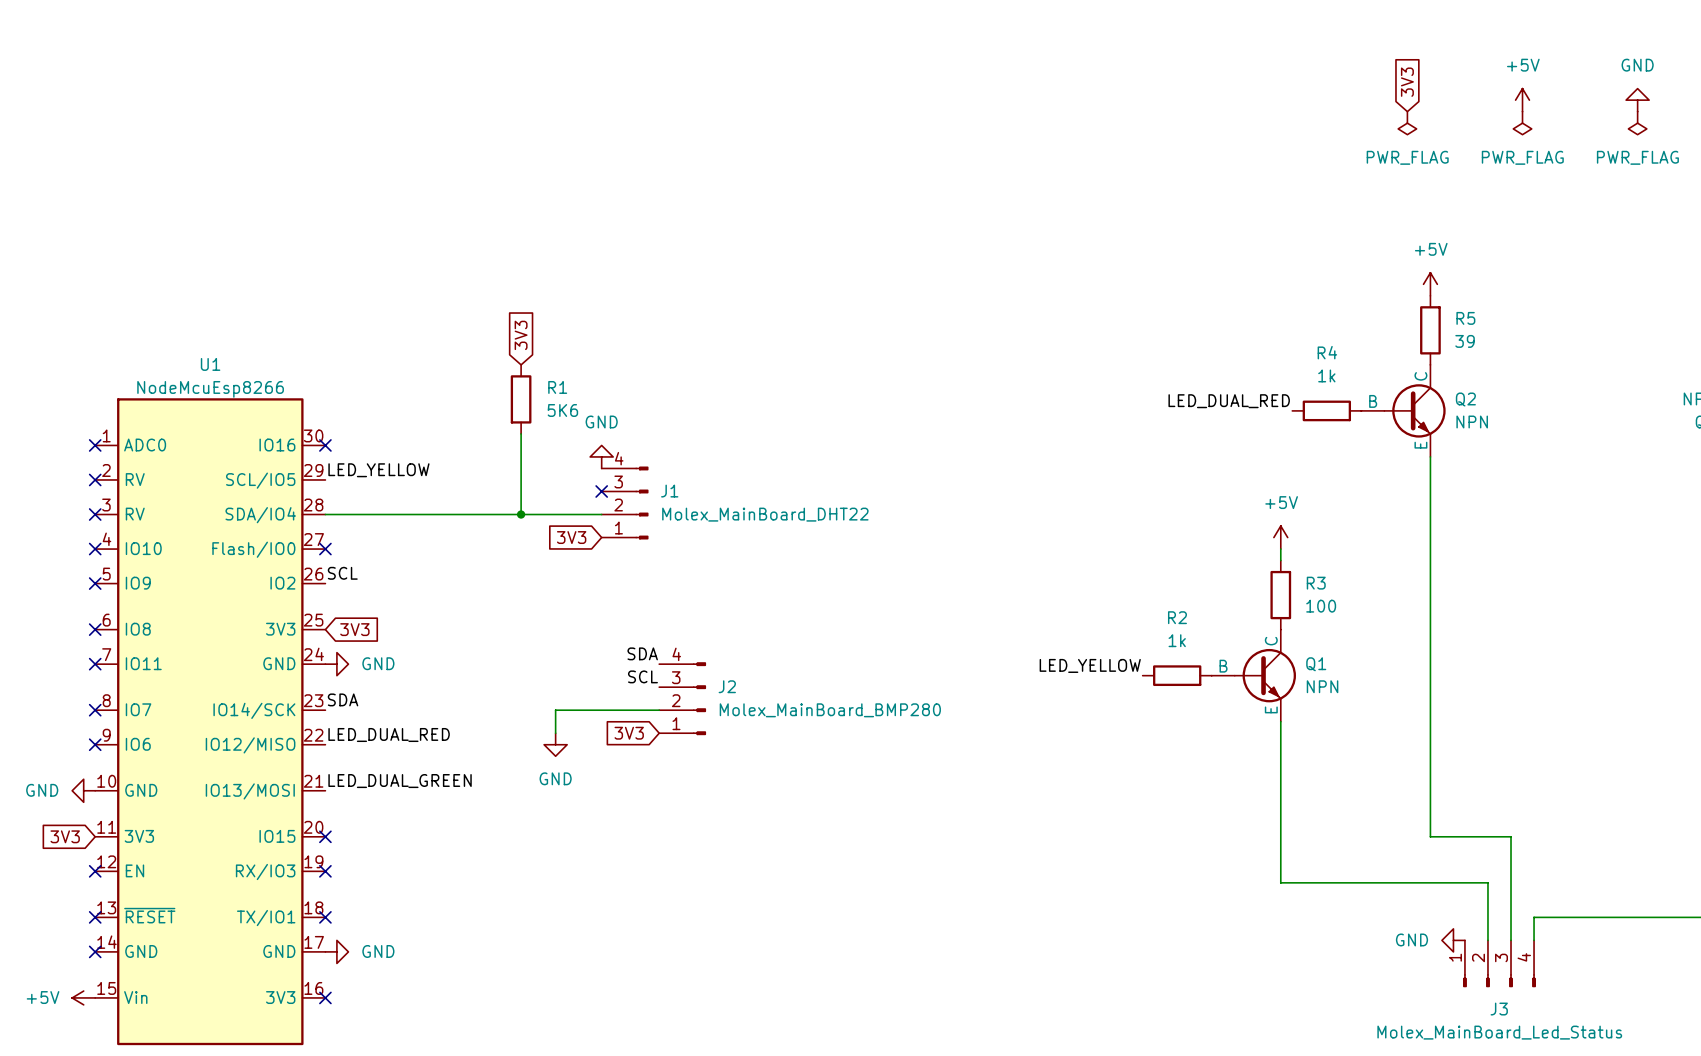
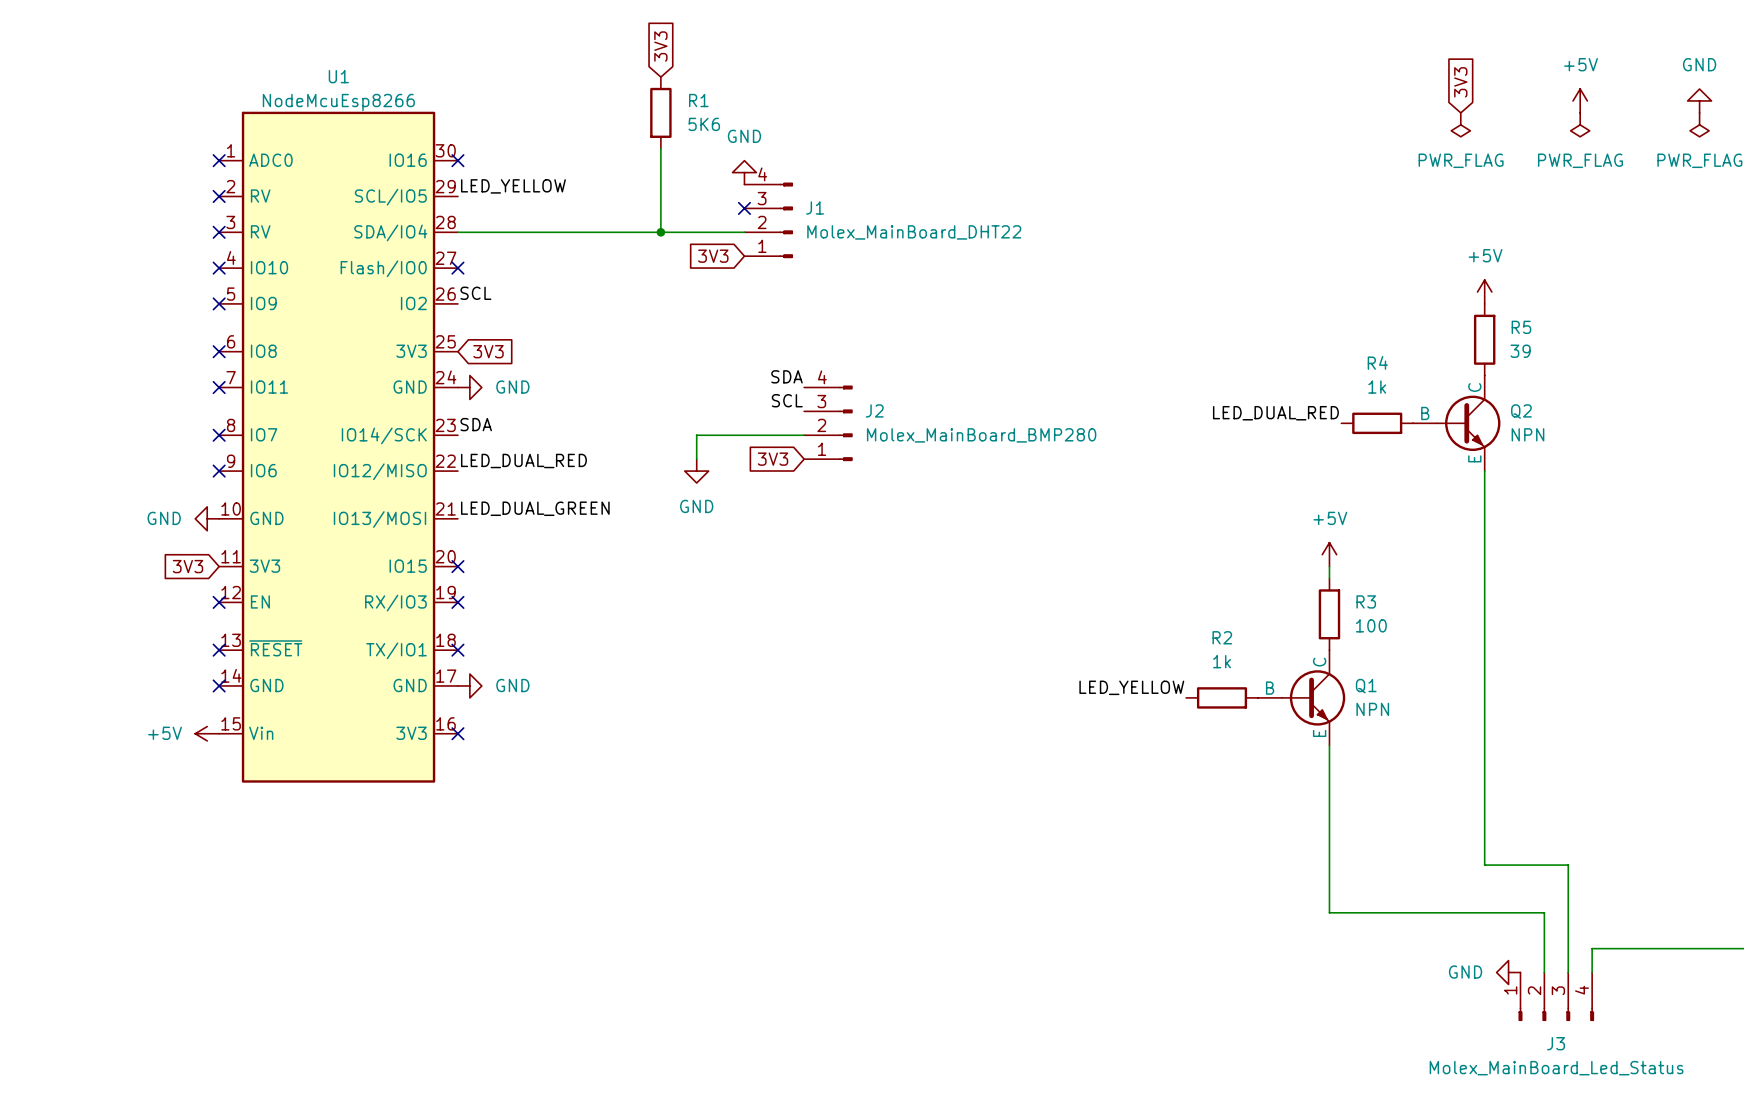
global label: none -> 3V3 (660, 46)
wire: none -> (660, 148) (660, 232)
no-connect mark: none -> (219, 160)
no-connect mark: none -> (457, 160)
power symbol: none -> GND (744, 172)
label: none -> LED_YELLOW (513, 186)
no-connect mark: none -> (219, 196)
no-connect mark: none -> (744, 208)
no-connect mark: none -> (219, 232)
wire: none -> (457, 232) (744, 232)
junction: none -> (660, 232)
global label: none -> 3V3 (713, 256)
no-connect mark: none -> (219, 268)
no-connect mark: none -> (457, 268)
label: none -> SCL (475, 293)
no-connect mark: none -> (219, 303)
global label rotation: 0° (521, 335) -> 90° clockwise (488, 351)
no-connect mark: none -> (219, 351)
label: none -> SDA (787, 376)
no-connect mark: none -> (219, 387)
power symbol: none -> GND (469, 387)
label: none -> SCL (787, 400)
R1 position: (521, 399) -> (660, 112)
label: none -> SDA (476, 424)
no-connect mark: none -> (219, 435)
wire: none -> (804, 435) (696, 435) (696, 459)
wire: (521, 433) (521, 514) -> none
no-connect mark: (95, 445) -> none
no-connect mark: (325, 445) -> none
global label: none -> 3V3 (773, 459)
label: none -> LED_DUAL_RED (523, 460)
no-connect mark: none -> (219, 471)
power symbol rotation: 0° (601, 456) -> 180° (696, 471)
power symbol position: GND (601, 456) -> GND (696, 471)
label: LED_YELLOW (378, 470) -> none
no-connect mark: (95, 479) -> none
no-connect mark: (601, 491) -> none
label: none -> LED_DUAL_GREEN (535, 508)
power symbol: none -> GND (207, 518)
J1 position: (625, 503) -> (768, 220)
no-connect mark: (95, 514) -> none
wire: (325, 514) (601, 514) -> none
junction: (521, 514) -> none
global label: 3V3 (571, 537) -> none
no-connect mark: (95, 549) -> none
no-connect mark: (325, 549) -> none
no-connect mark: none -> (457, 566)
label: SCL (342, 573) -> none
no-connect mark: (95, 583) -> none
no-connect mark: none -> (219, 602)
no-connect mark: none -> (457, 602)
no-connect mark: (95, 629) -> none
no-connect mark: none -> (219, 650)
global label rotation: 0° (354, 629) -> 180° (188, 566)
global label position: 3V3 (354, 629) -> 3V3 (188, 566)
no-connect mark: none -> (457, 650)
label: SDA (642, 653) -> none
no-connect mark: (95, 664) -> none
no-connect mark: none -> (219, 685)
power symbol: GND (336, 664) -> none
power symbol: none -> GND (469, 685)
label: SCL (642, 676) -> none
J2 position: (682, 698) -> (828, 423)
label: SDA (343, 699) -> none
no-connect mark: (95, 710) -> none
power symbol: none -> +5V (207, 733)
no-connect mark: none -> (457, 733)
wire: (659, 710) (555, 710) (555, 733) -> none
U1 position: (210, 721) -> (338, 447)
global label: 3V3 (629, 733) -> none
label: LED_DUAL_RED (389, 735) -> none
no-connect mark: (95, 744) -> none
power symbol: GND (555, 744) -> none
label: LED_DUAL_GREEN (400, 781) -> none
power symbol: GND (83, 790) -> none
global label: 3V3 (65, 836) -> none
no-connect mark: (325, 836) -> none
no-connect mark: (95, 871) -> none
no-connect mark: (325, 871) -> none
no-connect mark: (95, 917) -> none
no-connect mark: (325, 917) -> none
no-connect mark: (95, 951) -> none
power symbol: GND (336, 951) -> none
power symbol: +5V (83, 997) -> none
no-connect mark: (325, 997) -> none

